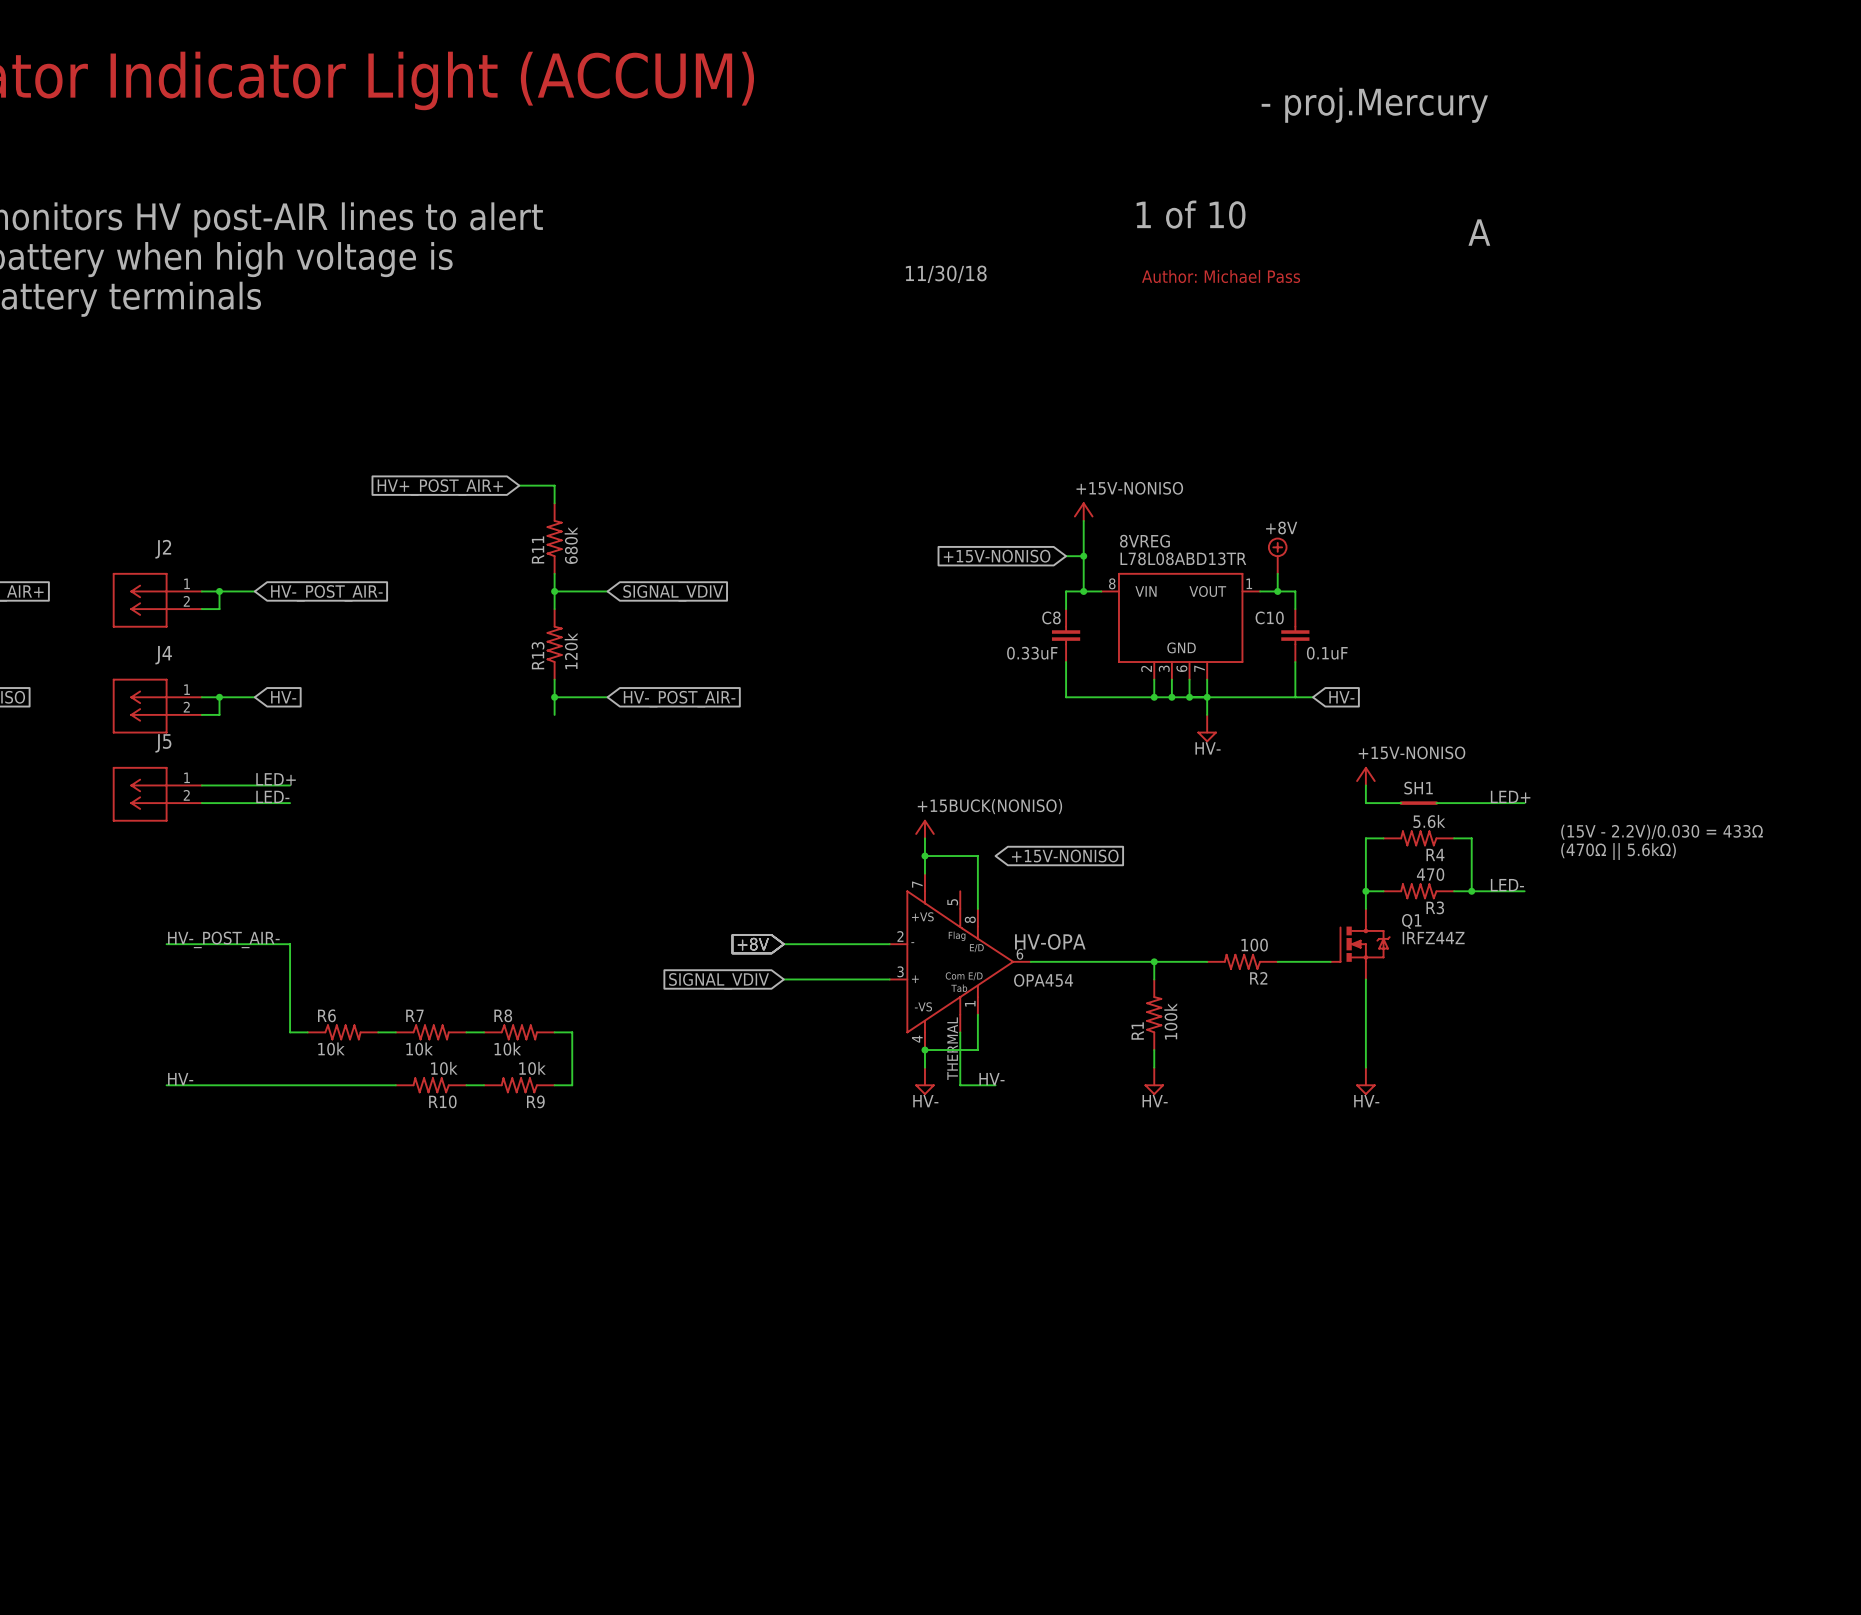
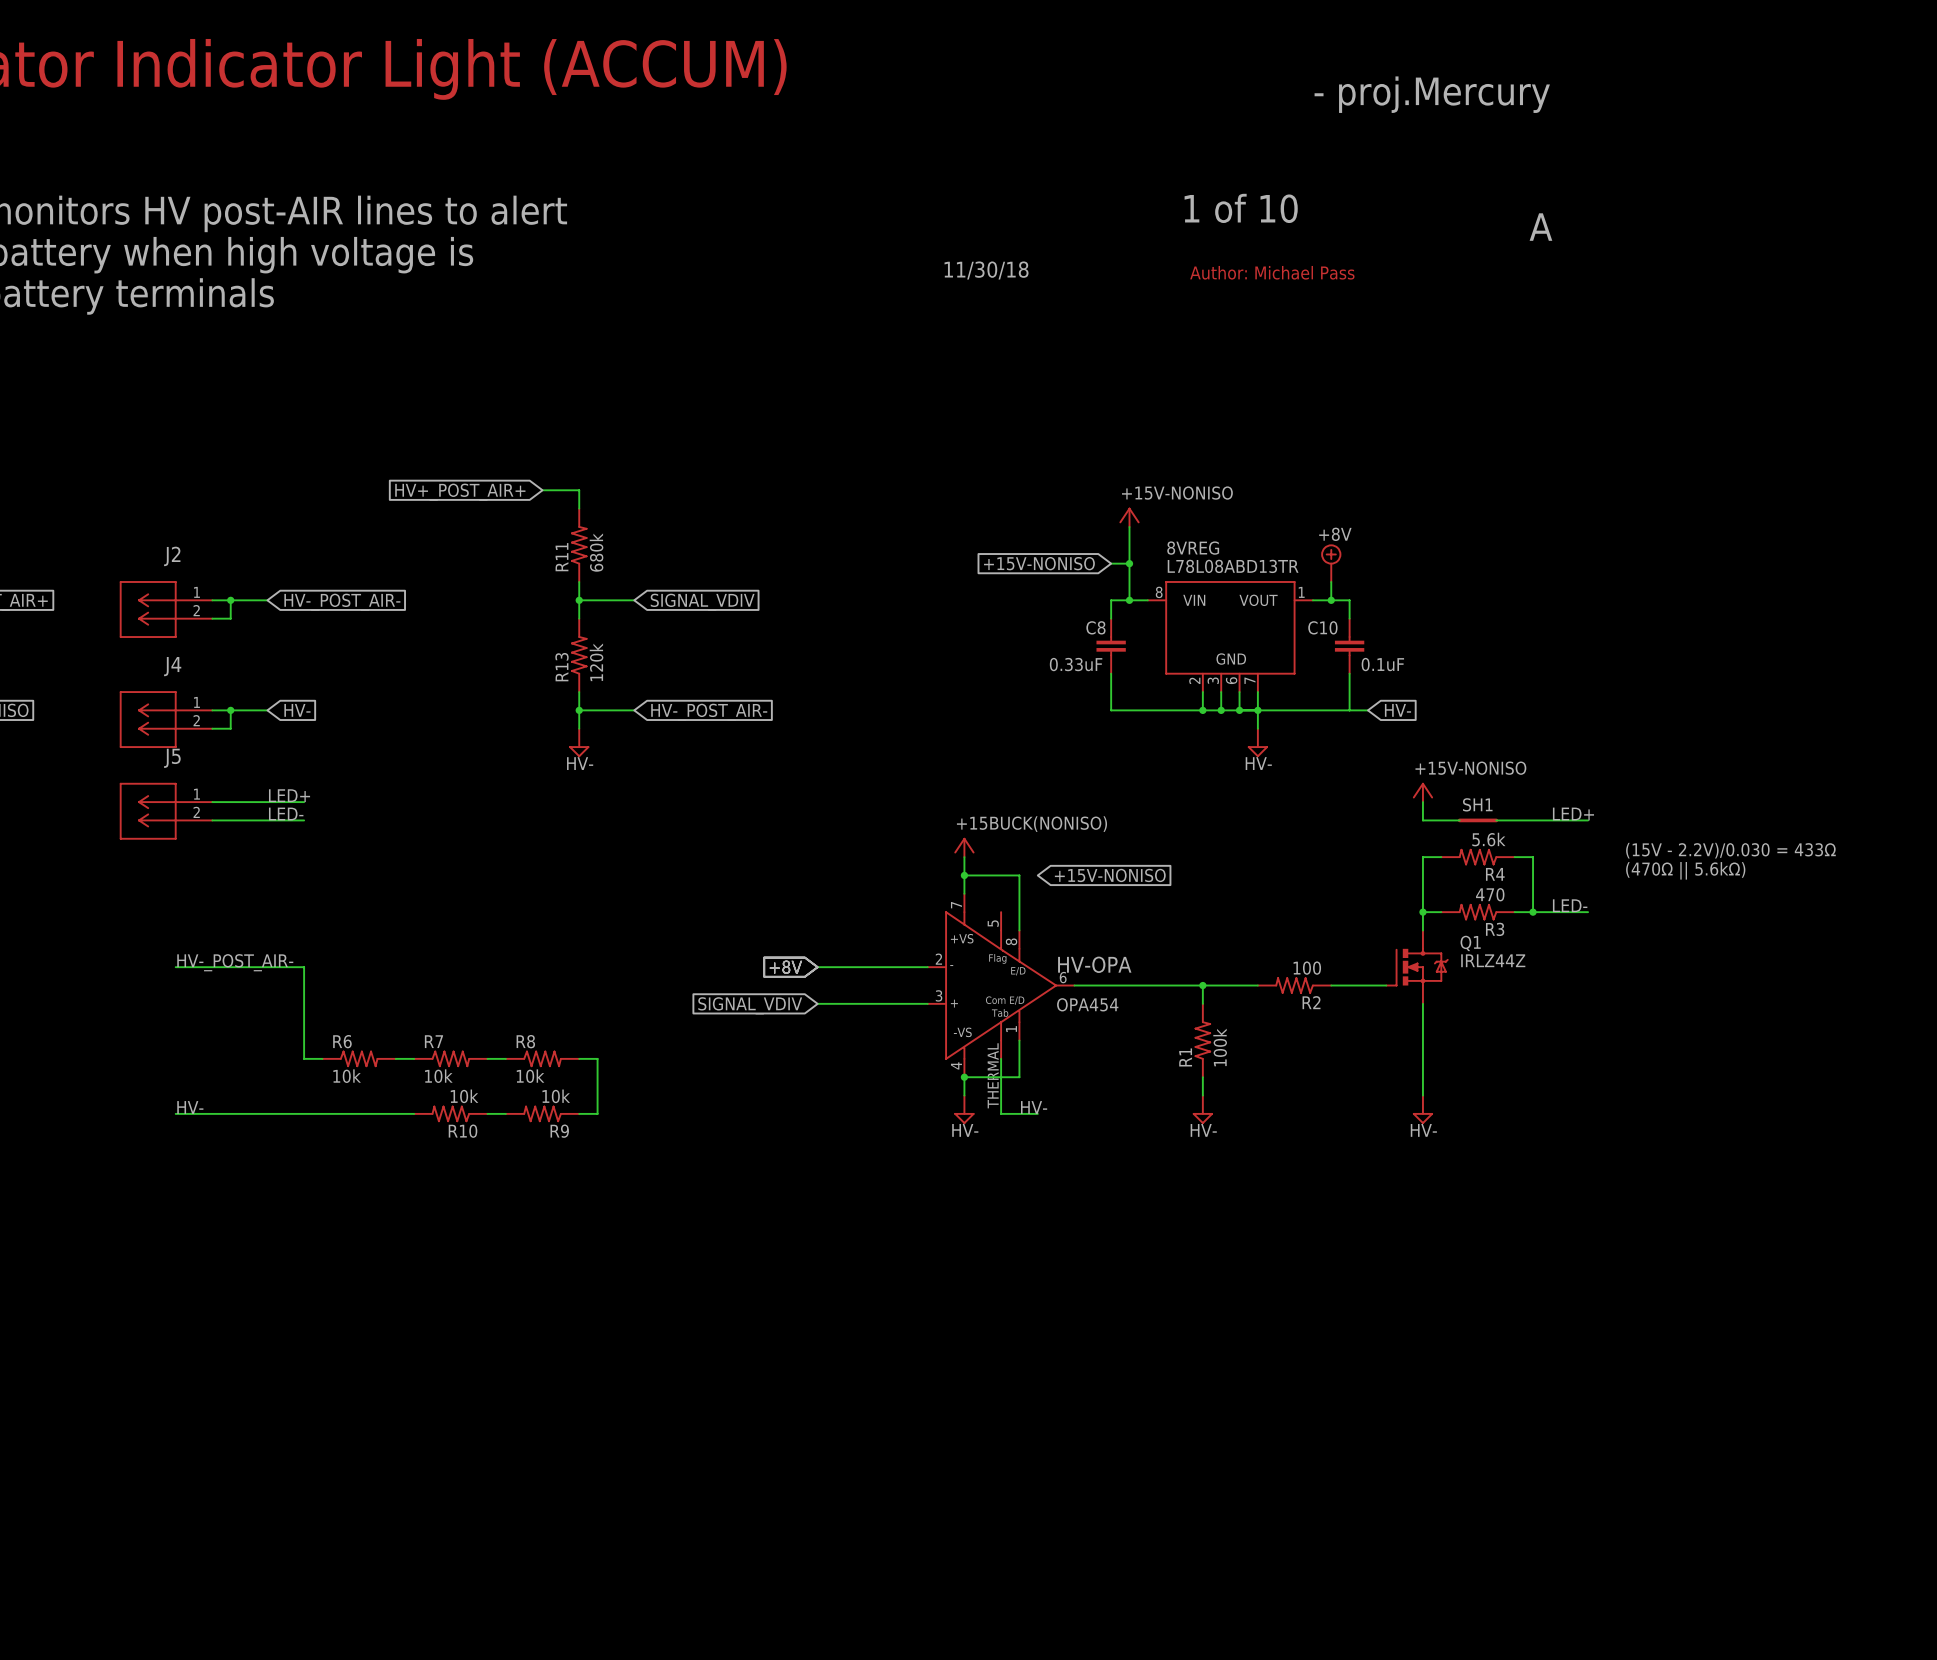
power symbol: none -> HV- (579, 742)
Q1 value: IRFZ44Z (1433, 938) -> IRLZ44Z (1493, 960)

